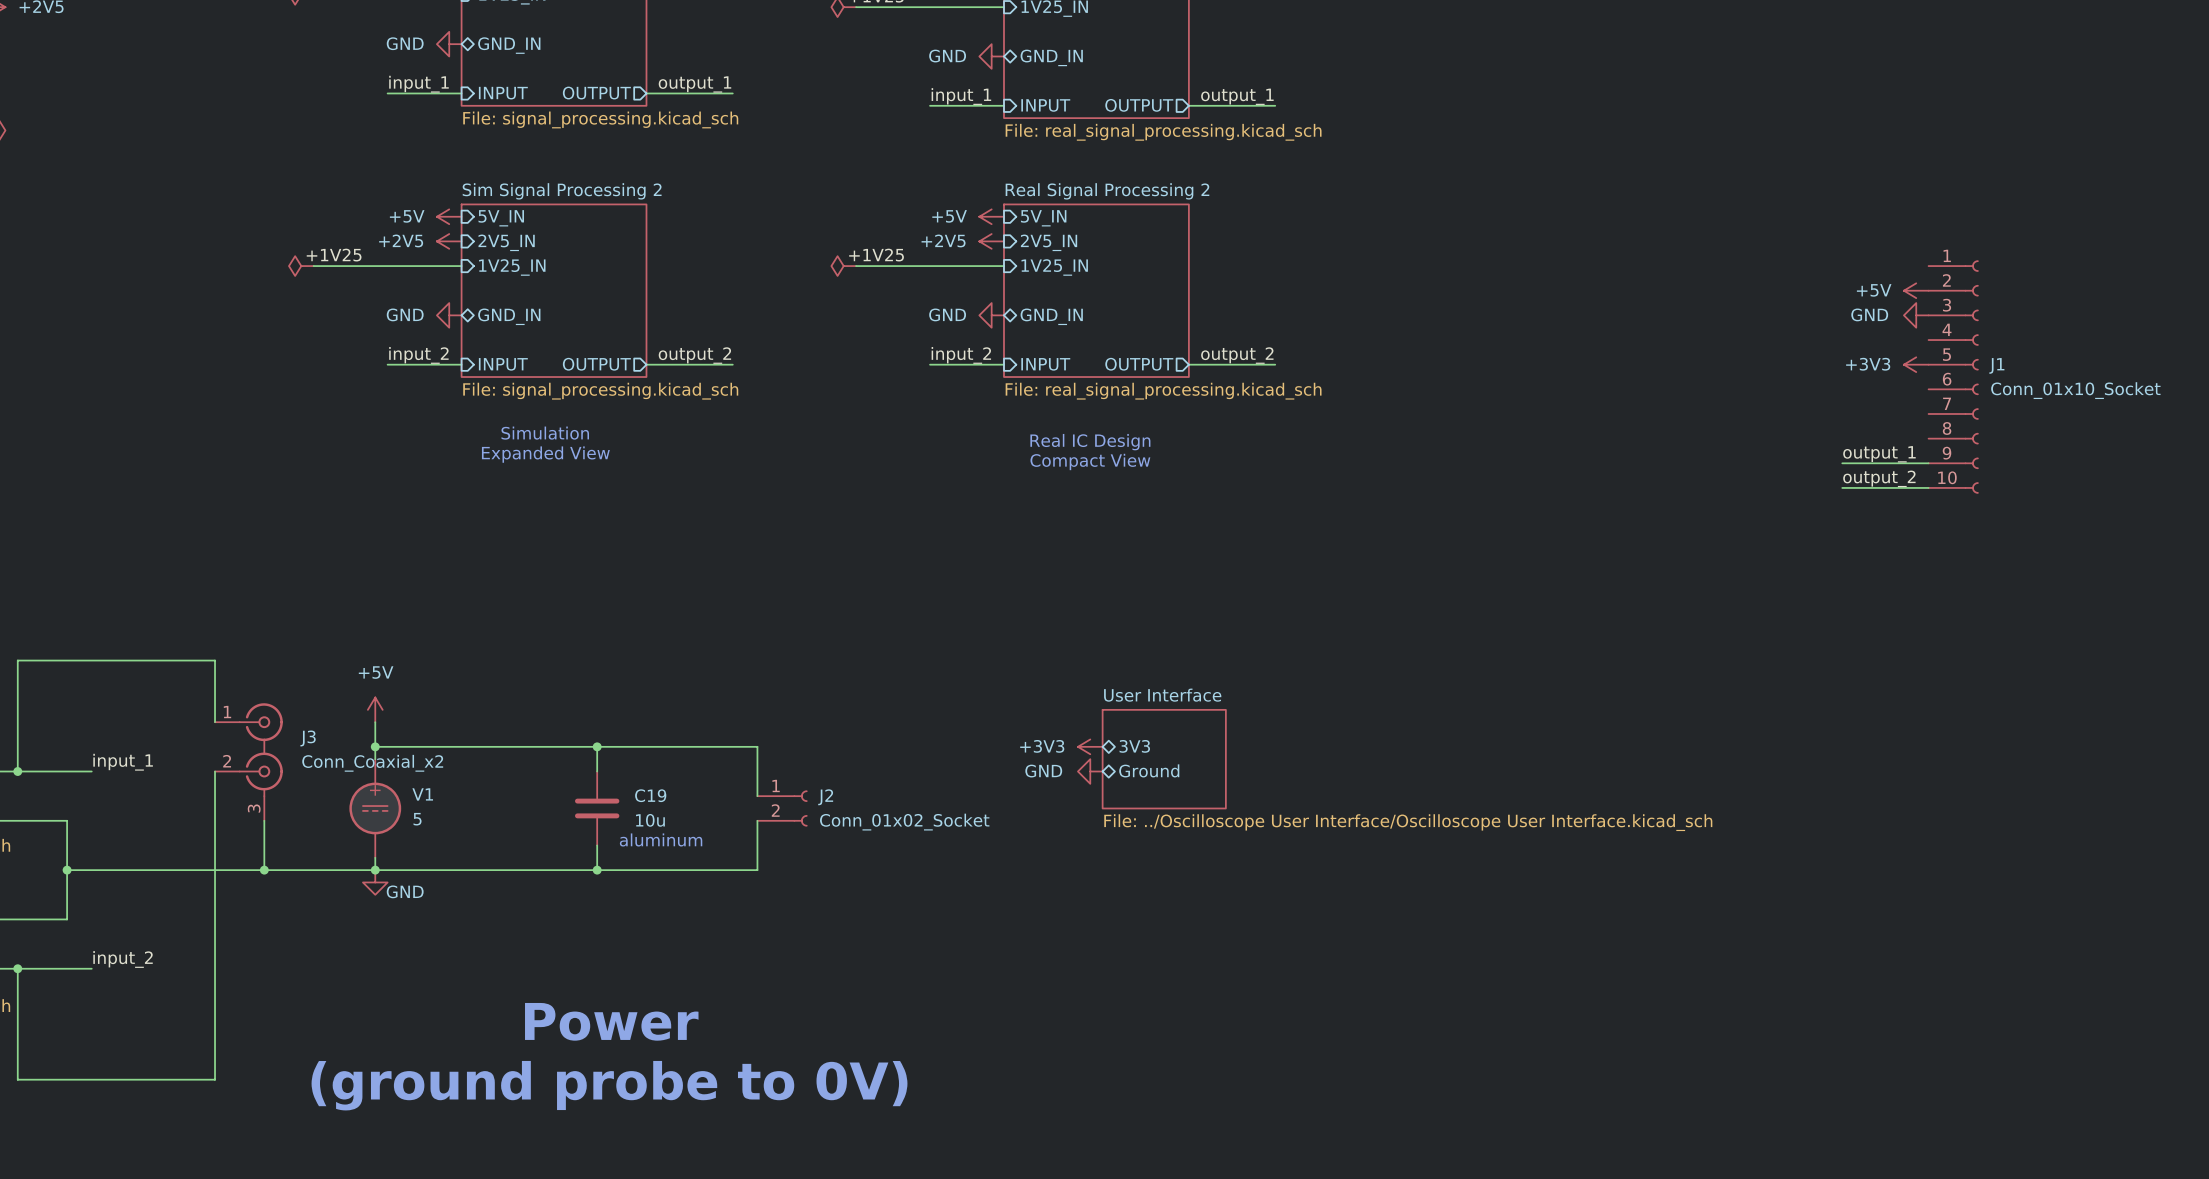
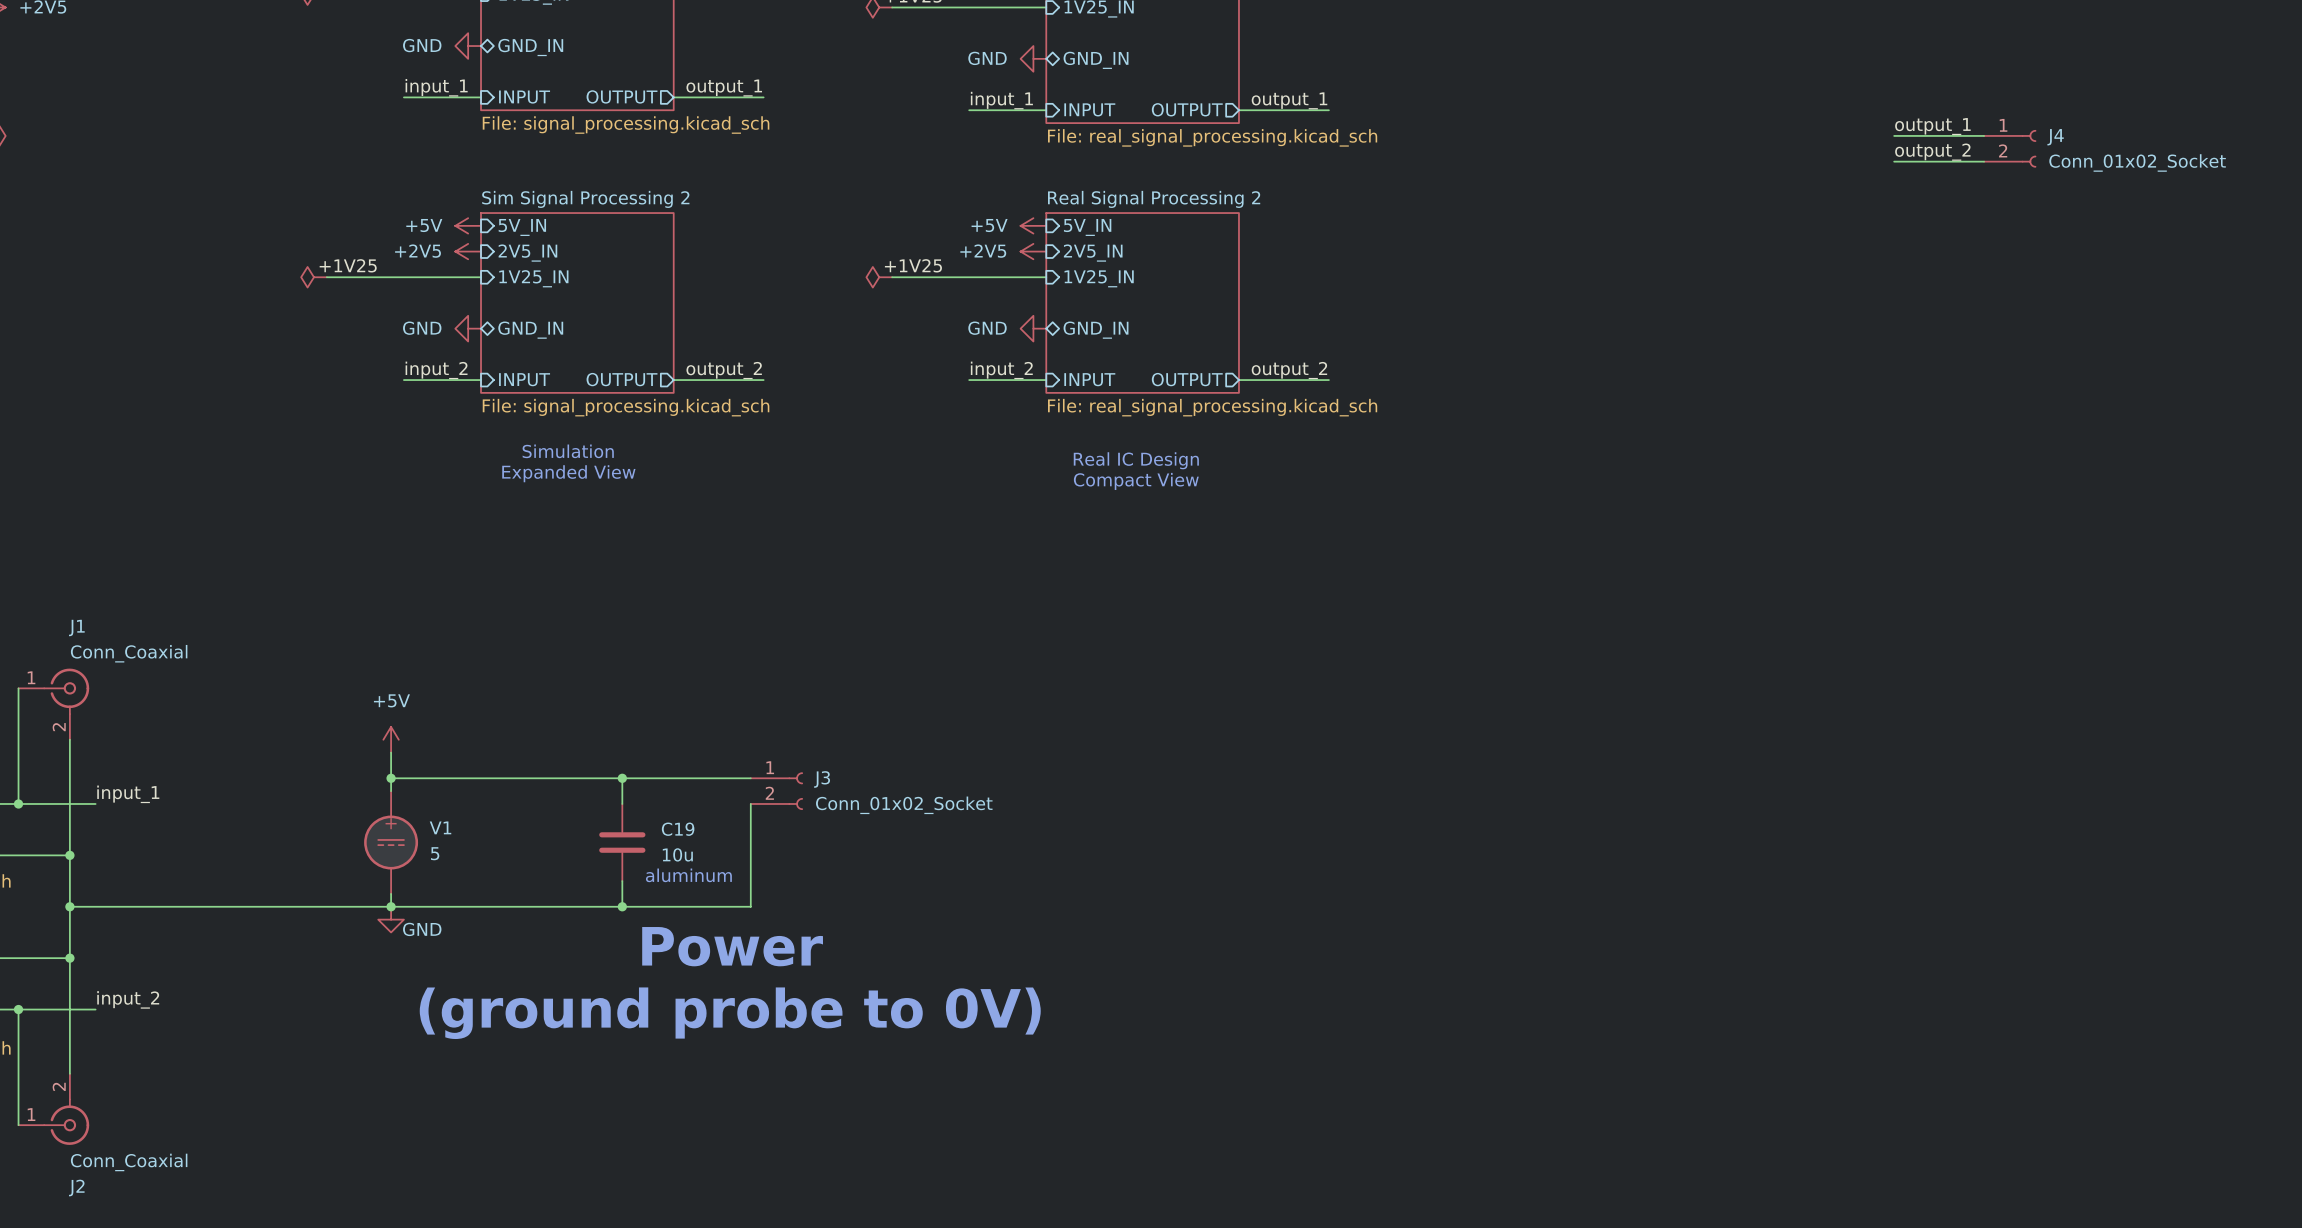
label: none -> output_1 (1932, 126)
wire: none -> (1894, 135) (1984, 135)
J4: none -> Conn_01x02_Socket (2010, 148)
label: none -> output_2 (1932, 152)
wire: none -> (1894, 161) (1984, 161)
J1 symbol: [1928, 260, 1979, 494] -> [18, 668, 90, 740]
power symbol: +5V (1916, 290) -> none
power symbol: GND (1916, 315) -> none
power symbol: +3V3 (1916, 364) -> none
J1 name position: J1 (1996, 365) -> J1 (76, 627)
J1 value: Conn_01x10_Socket (2075, 390) -> Conn_Coaxial (129, 653)
label: output_1 (1879, 454) -> none
wire: (1842, 463) (1928, 463) -> none
label: output_2 (1879, 478) -> none
wire: (1842, 487) (1928, 487) -> none
wire: (17, 660) (215, 660) (215, 722) -> none
J3 symbol: [215, 703, 283, 821] -> [750, 772, 803, 810]
wire: none -> (69, 739) (69, 855)
J3 name position: J3 (308, 738) -> J3 (822, 779)
wire: (720, 746) (757, 746) (757, 796) -> none
power symbol: +3V3 (1090, 746) -> none
sheet pin: 3V3 (1134, 746) -> none
sheet User Interface: File: ../Oscilloscope User Interface/Oscilloscope User Interface.kicad_sch (1164, 759) -> none
J3 value: Conn_Coaxial_x2 (372, 763) -> Conn_01x02_Socket (904, 805)
sheet pin: Ground (1149, 770) -> none
wire: (215, 771) (215, 1079) (17, 1079) -> none
power symbol: GND (1090, 771) -> none
J2 symbol: [757, 790, 808, 827] -> [18, 1073, 90, 1145]
J2 name position: J2 (825, 797) -> J2 (76, 1188)
junction: none -> (69, 855)
wire: (264, 820) (264, 870) -> none
wire: (757, 820) (757, 870) (720, 870) -> (750, 803) (750, 906)
J2 value: Conn_01x02_Socket (904, 822) -> Conn_Coaxial (129, 1162)
junction: (264, 870) -> none
wire: none -> (69, 958) (69, 1073)
junction: none -> (69, 958)
text position: Power (611, 1021) -> Power (732, 946)
text position: (ground probe to 0V) (609, 1085) -> (ground probe to 0V) (730, 1013)

